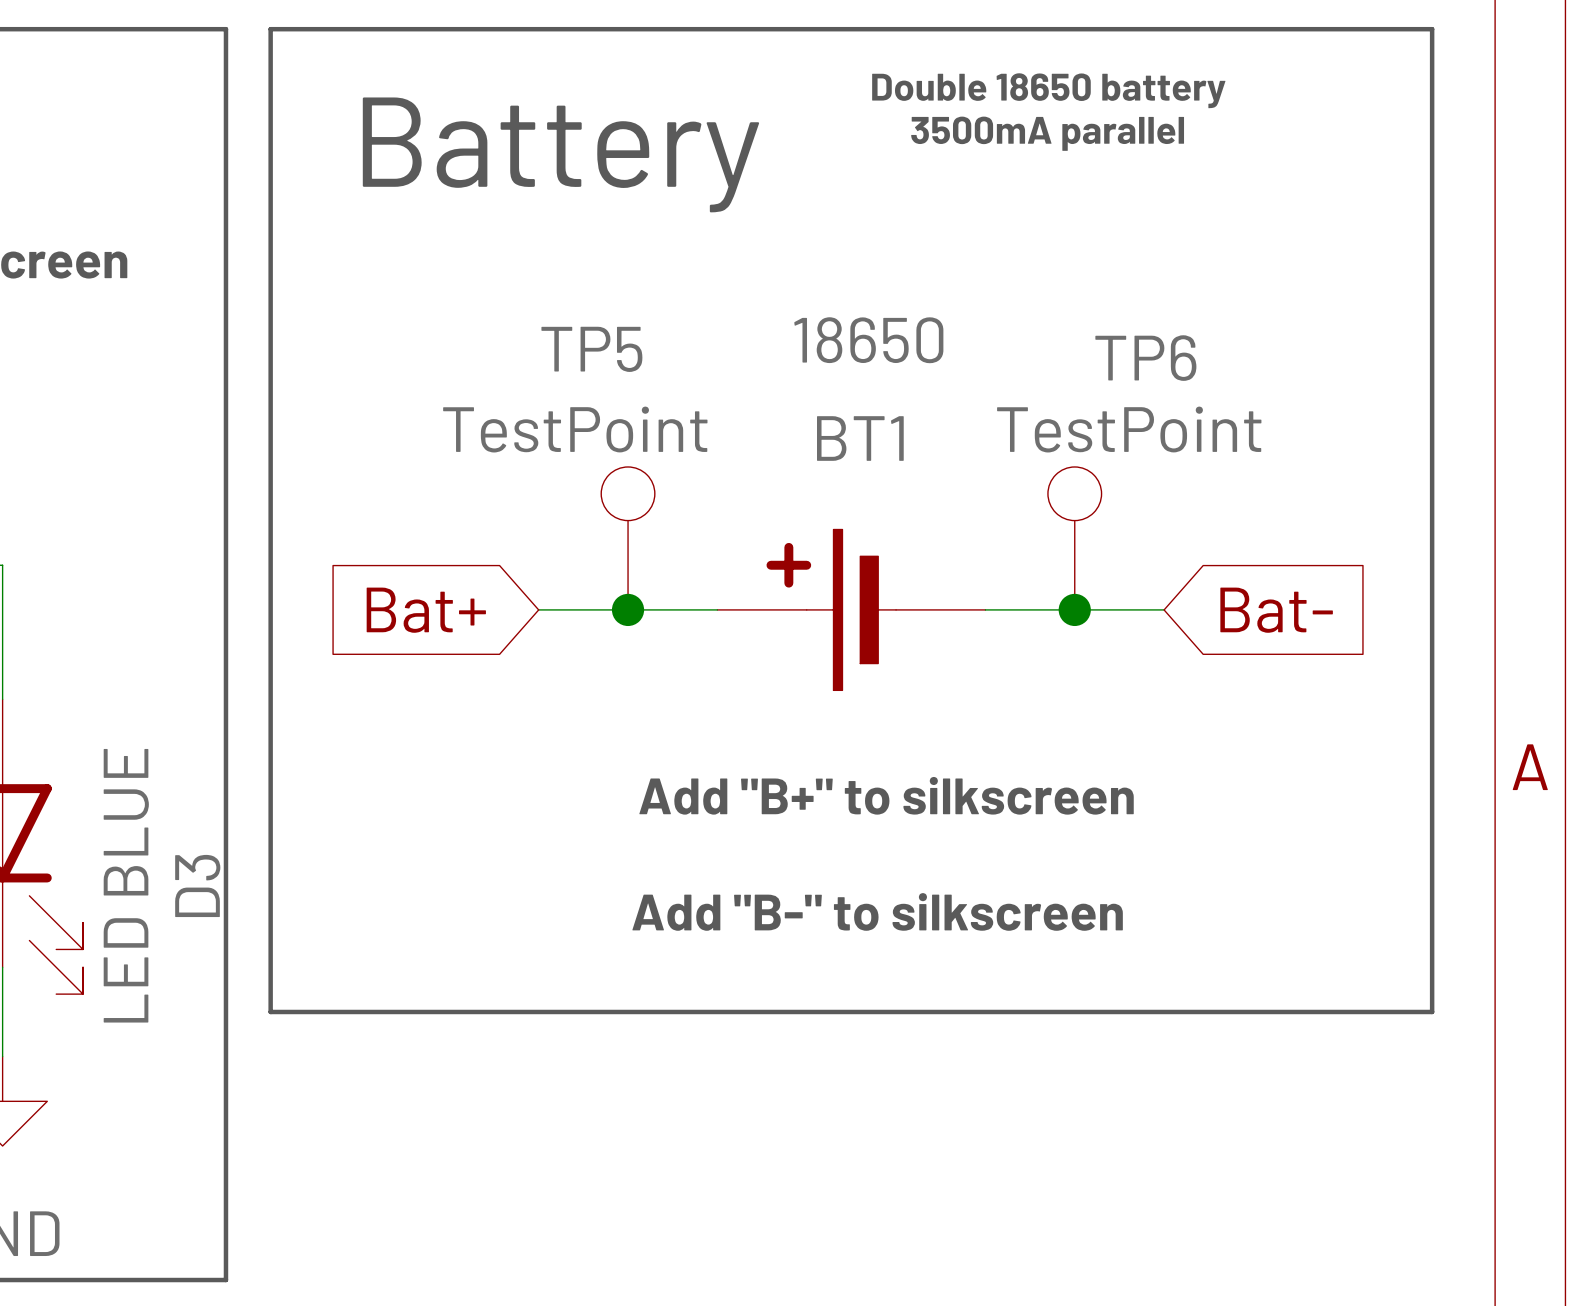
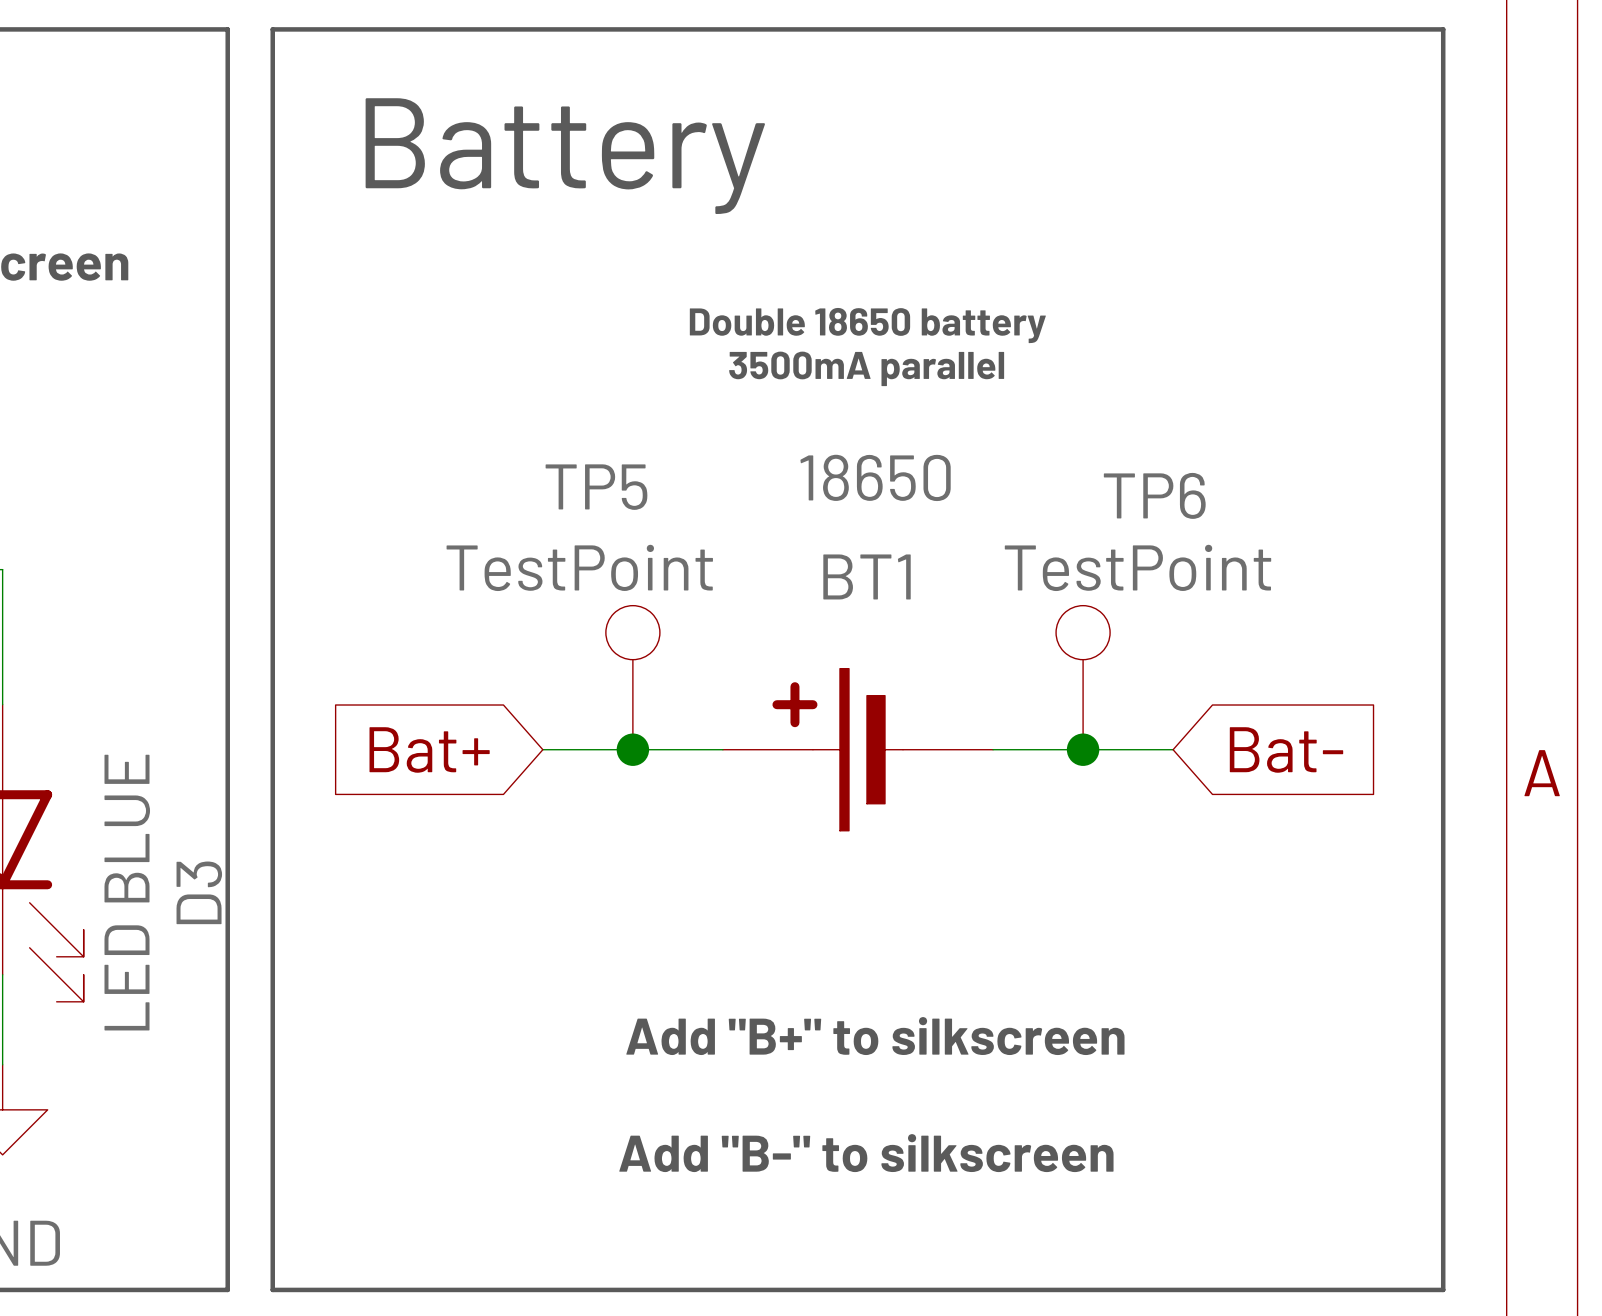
text position: Double 18650 battery (1048, 90) -> Double 18650 battery (867, 325)
text position: 3500mA parallel (1047, 133) -> 3500mA parallel (866, 368)
TP5 position: (628, 538) -> (632, 677)
TP6 position: (1074, 538) -> (1083, 677)
wire: (538, 609) (717, 609) -> (542, 749) (722, 749)
junction position: (628, 609) -> (632, 749)
BT1 position: (851, 609) -> (857, 749)
wire: (985, 609) (1164, 609) -> (993, 749) (1173, 749)
junction position: (1074, 609) -> (1083, 749)
global label position: Bat+ (426, 610) -> Bat+ (429, 749)
global label position: Bat- (1276, 610) -> Bat- (1286, 749)
text position: Add "B+" to silkscreen (886, 795) -> Add "B+" to silkscreen (875, 1036)
text position: Add "B-" to silkscreen (877, 911) -> Add "B-" to silkscreen (866, 1153)
line: (270, 1011) (1432, 1011) -> (272, 1019) (272, 1289) (1443, 1289) (1443, 1019)

